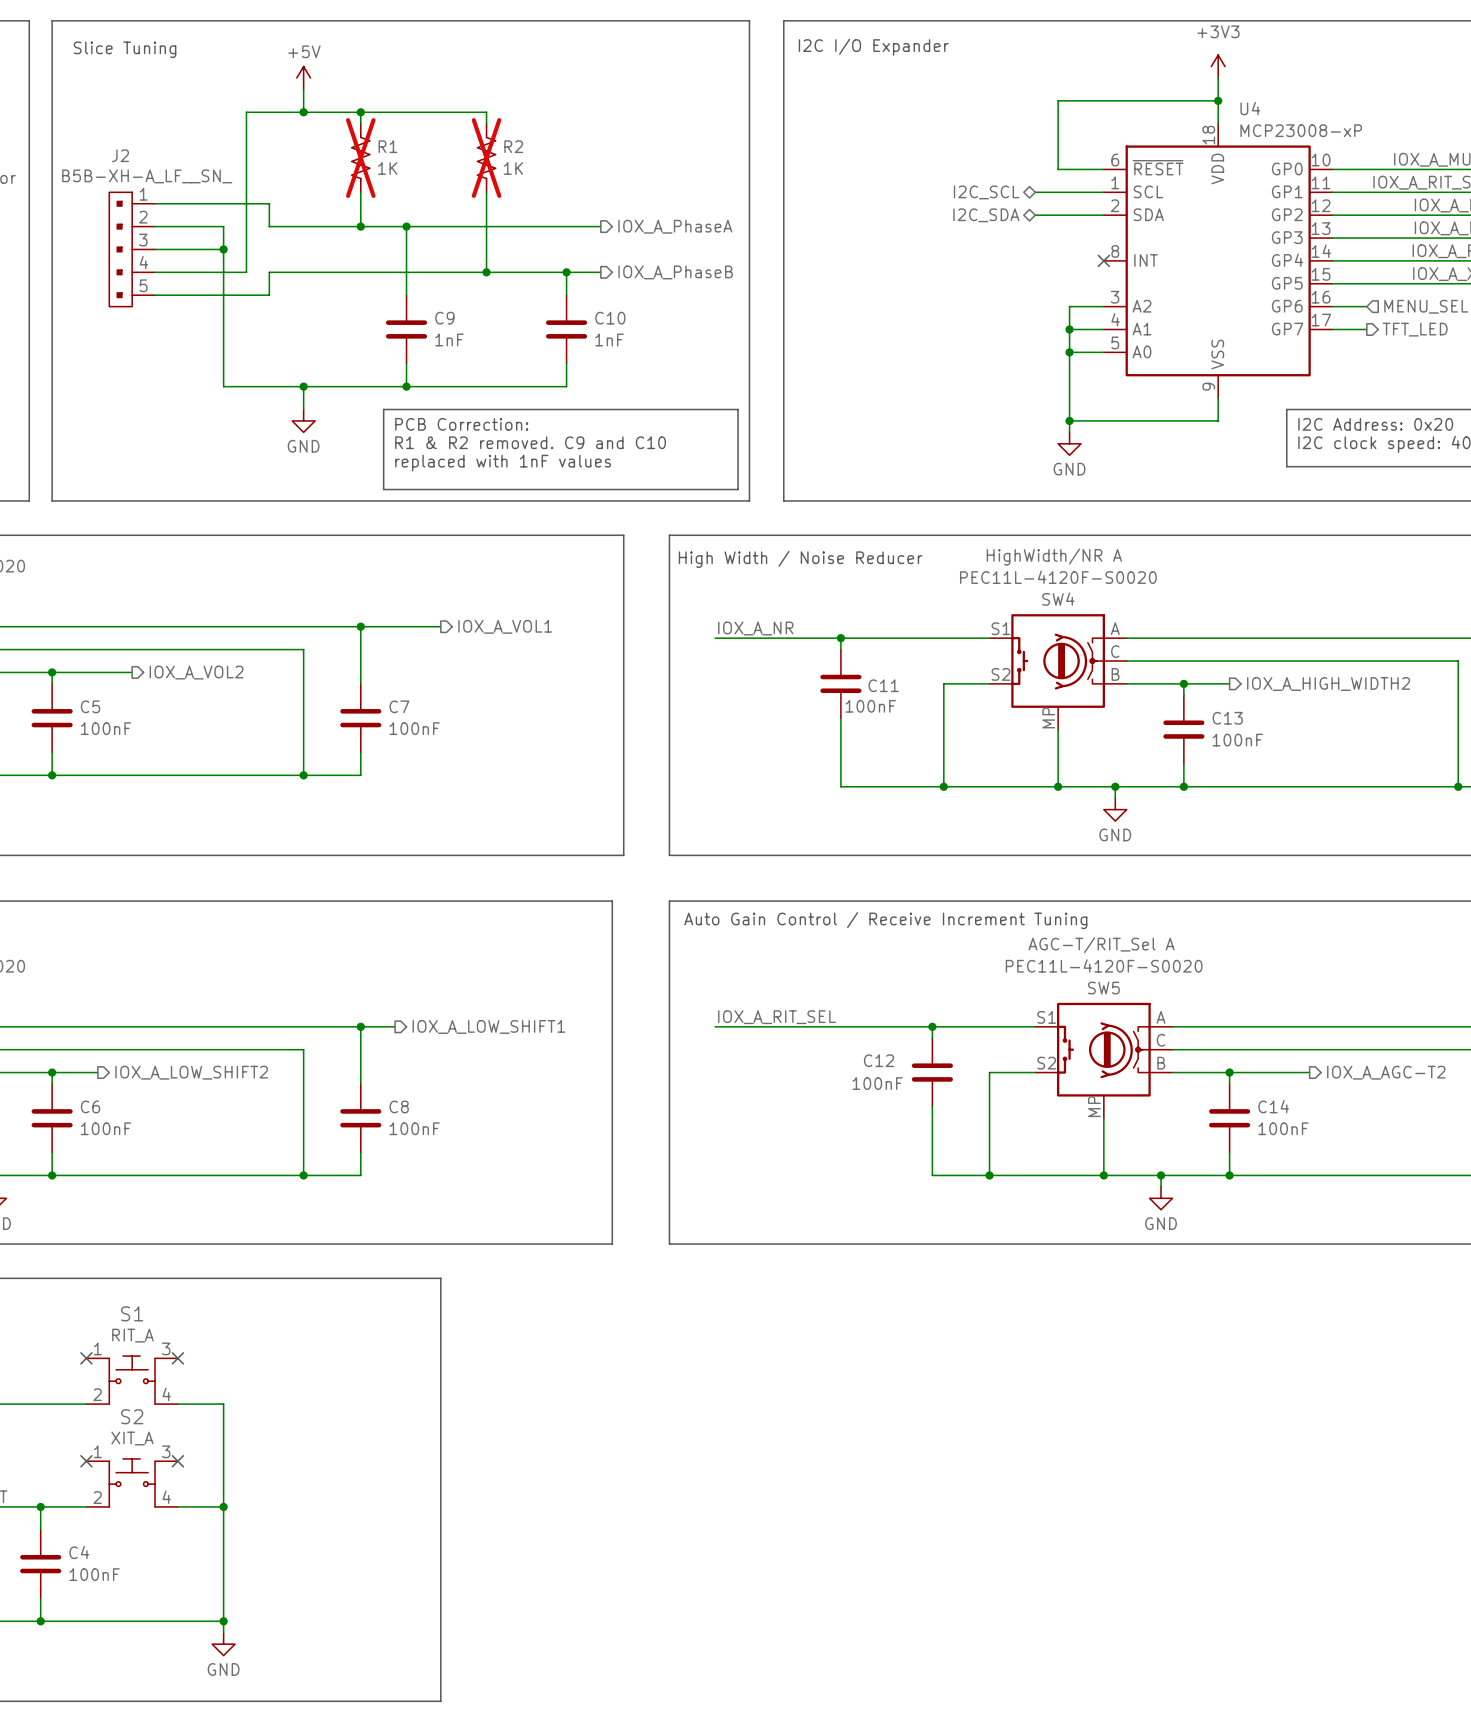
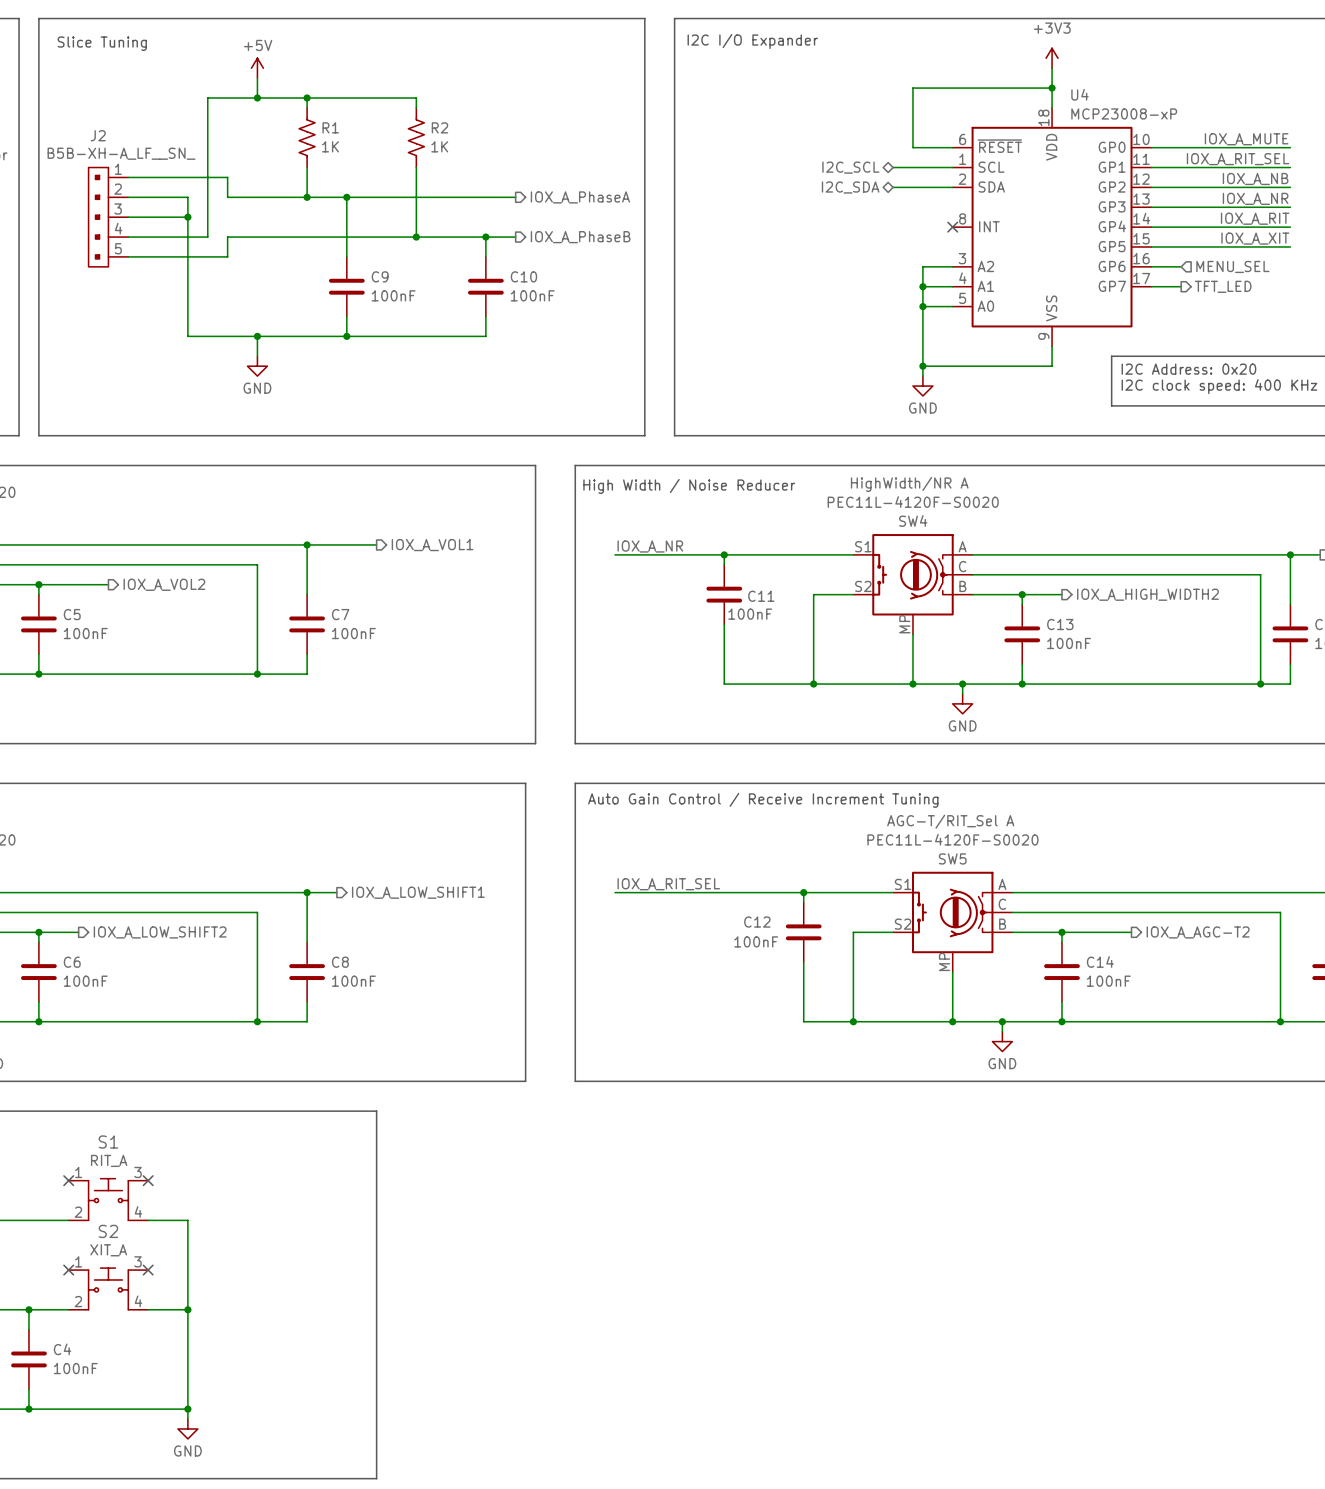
R1 do-not-place cross: (360, 158) -> none
R2 do-not-place cross: (486, 158) -> none
C9 value: 1nF (449, 339) -> 100nF (393, 295)
C10 value: 1nF (609, 339) -> 100nF (532, 295)
line: (383, 409) (738, 409) (738, 489) (383, 489) (383, 409) -> none
text: PCB Correction: (461, 424) -> none
text: R1 & R2 removed. C9 and C10 (530, 442) -> none
text: replaced with 1nF values (503, 463) -> none

